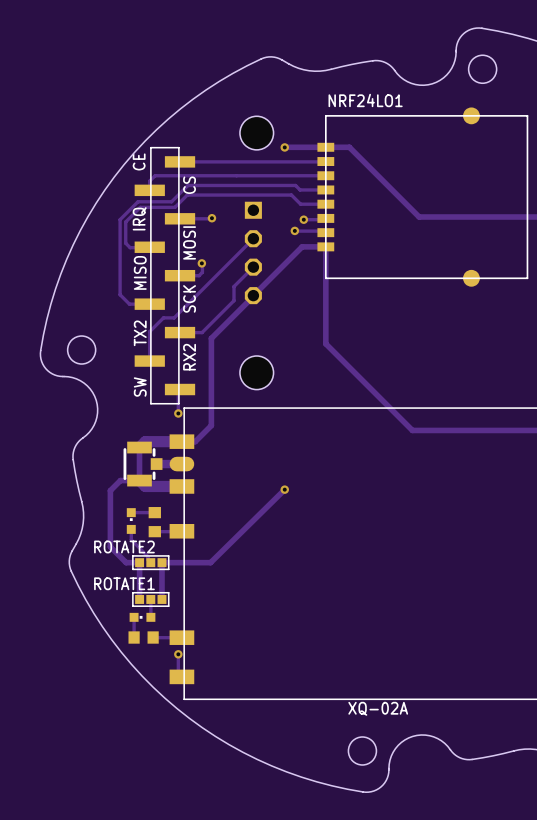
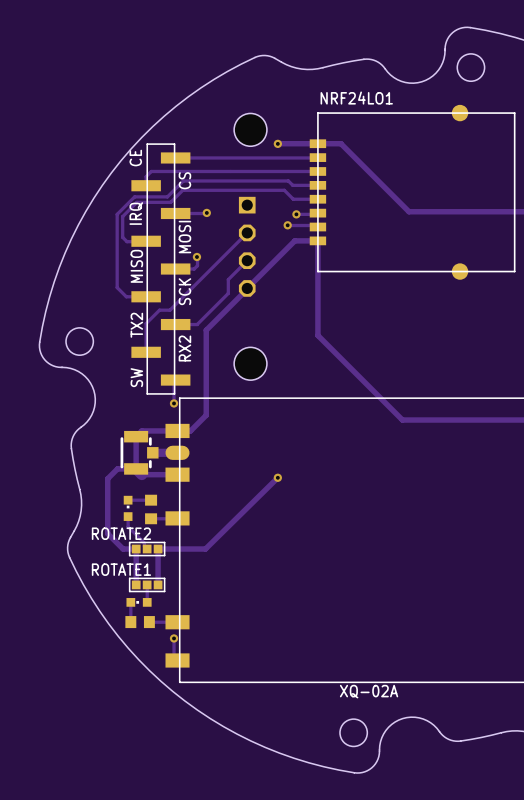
track width: thick (181, 441) (145, 441) (139, 447) -> thin (177, 430) (141, 430) (136, 436)
track width: thick (145, 486) (181, 486) -> thin (141, 474) (177, 474)

